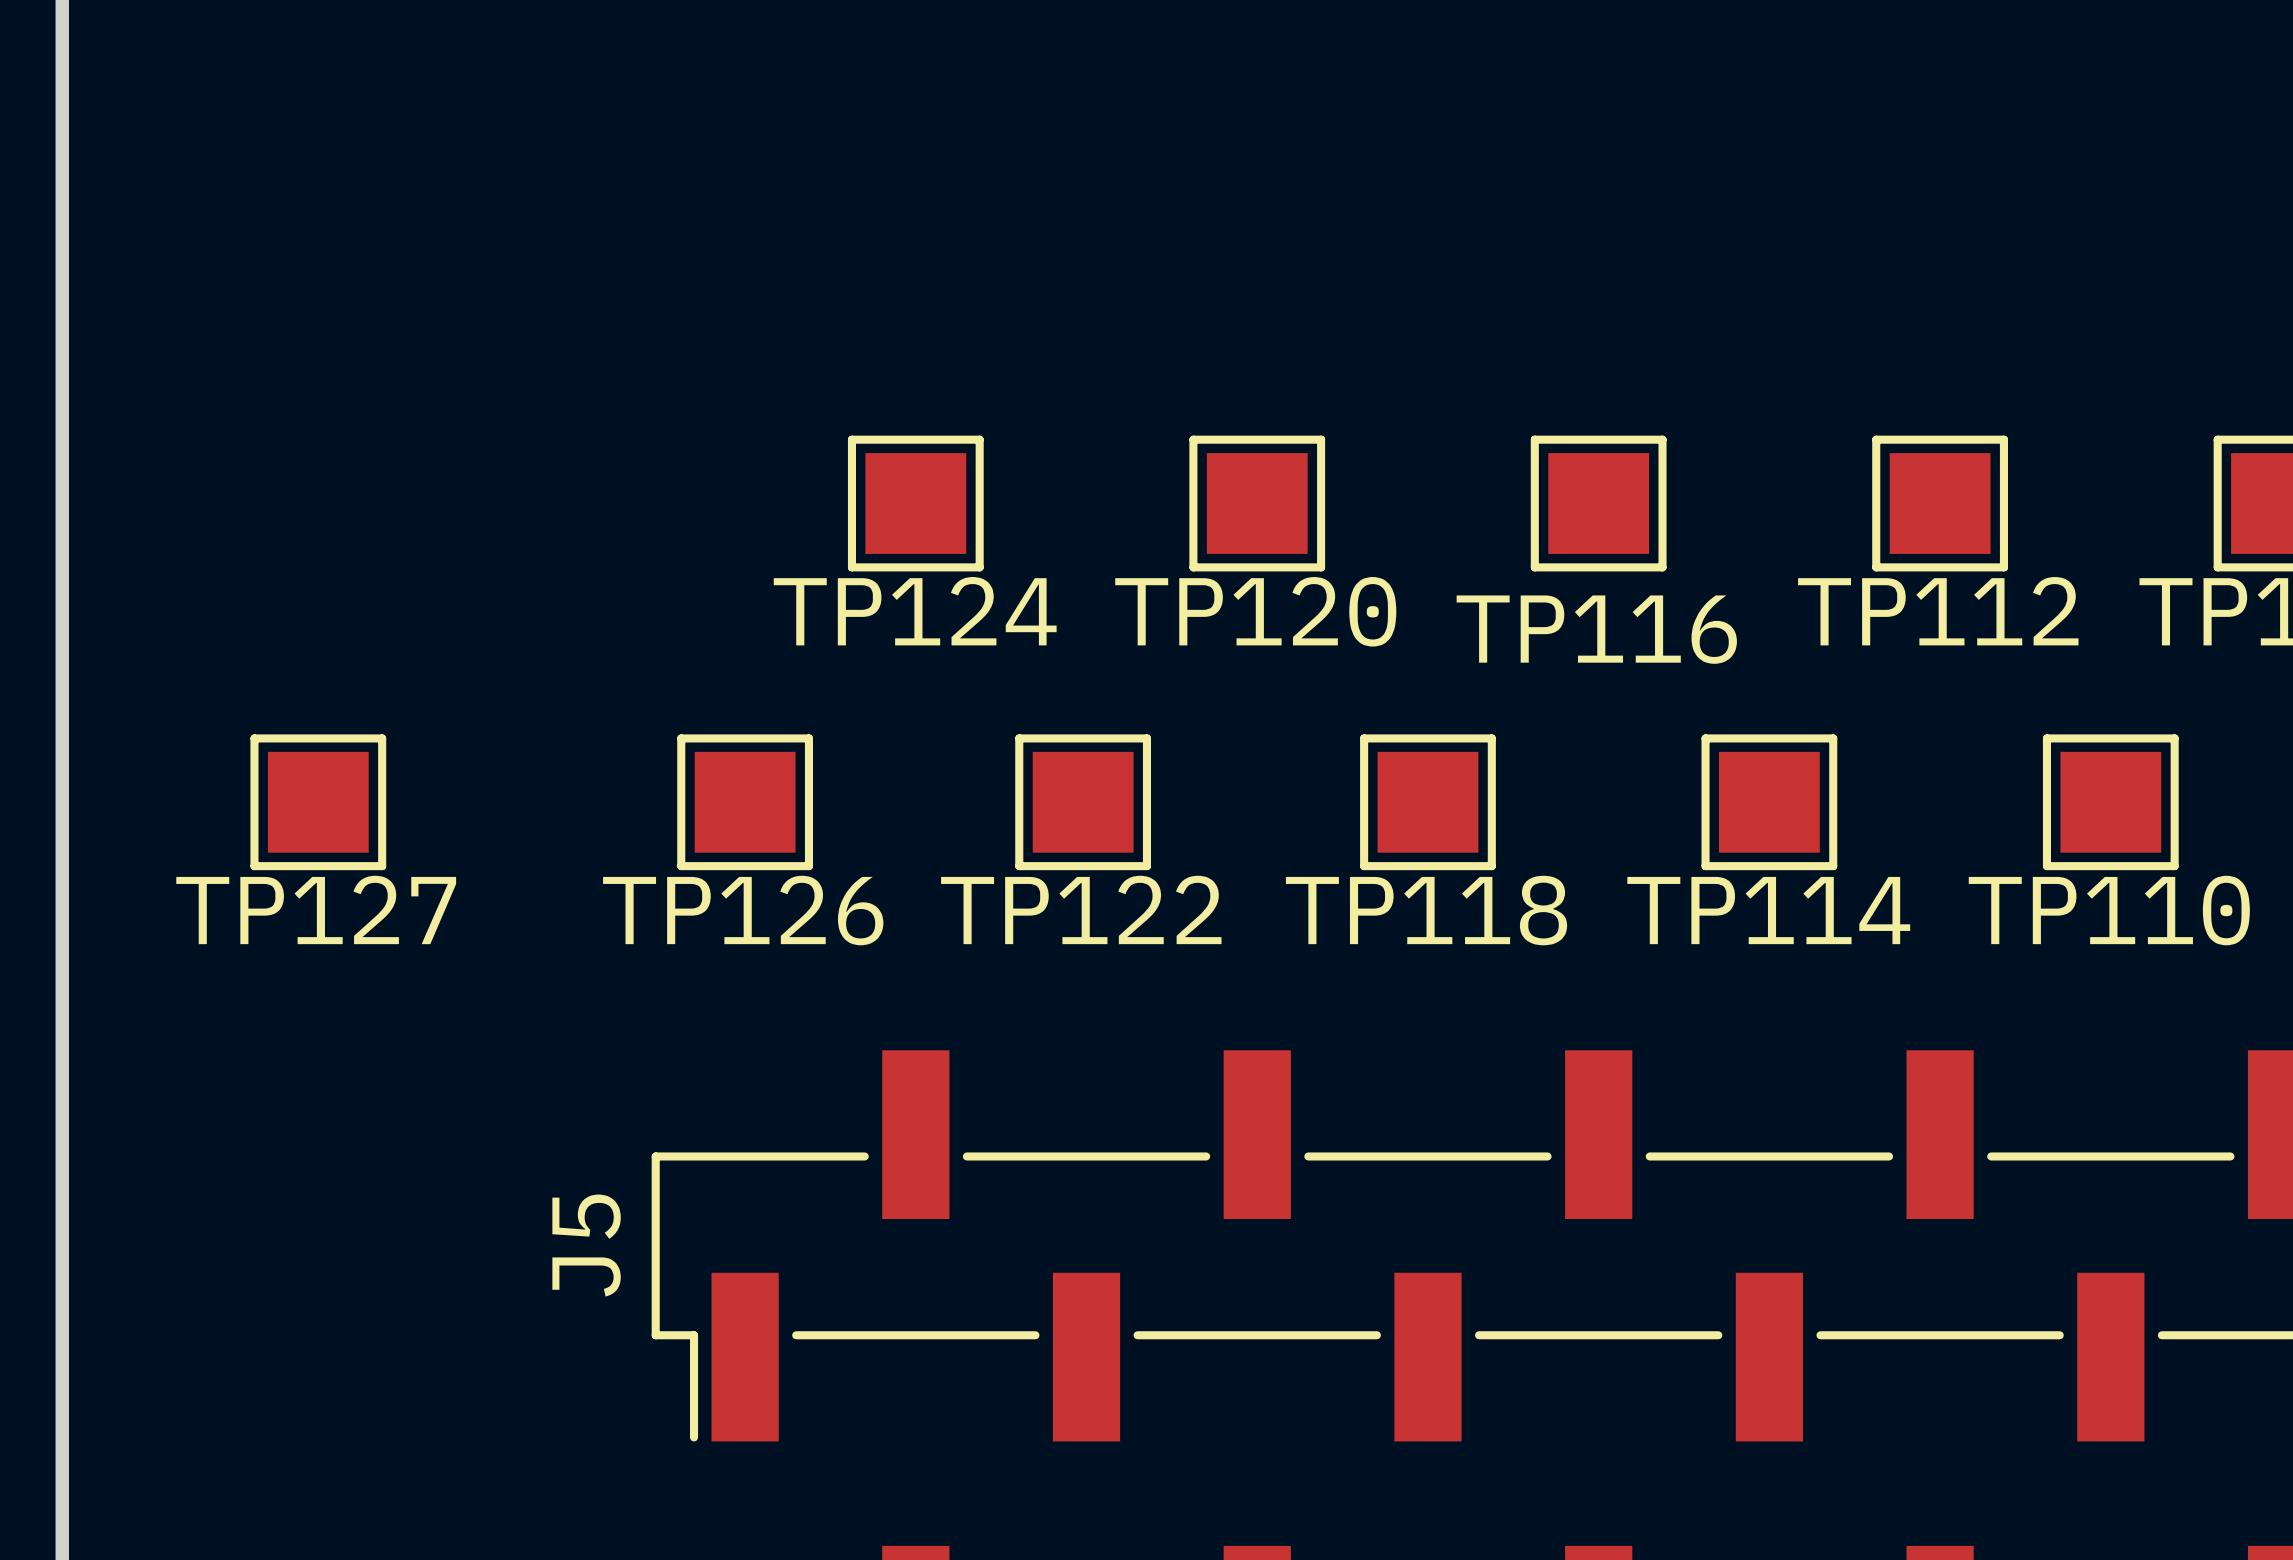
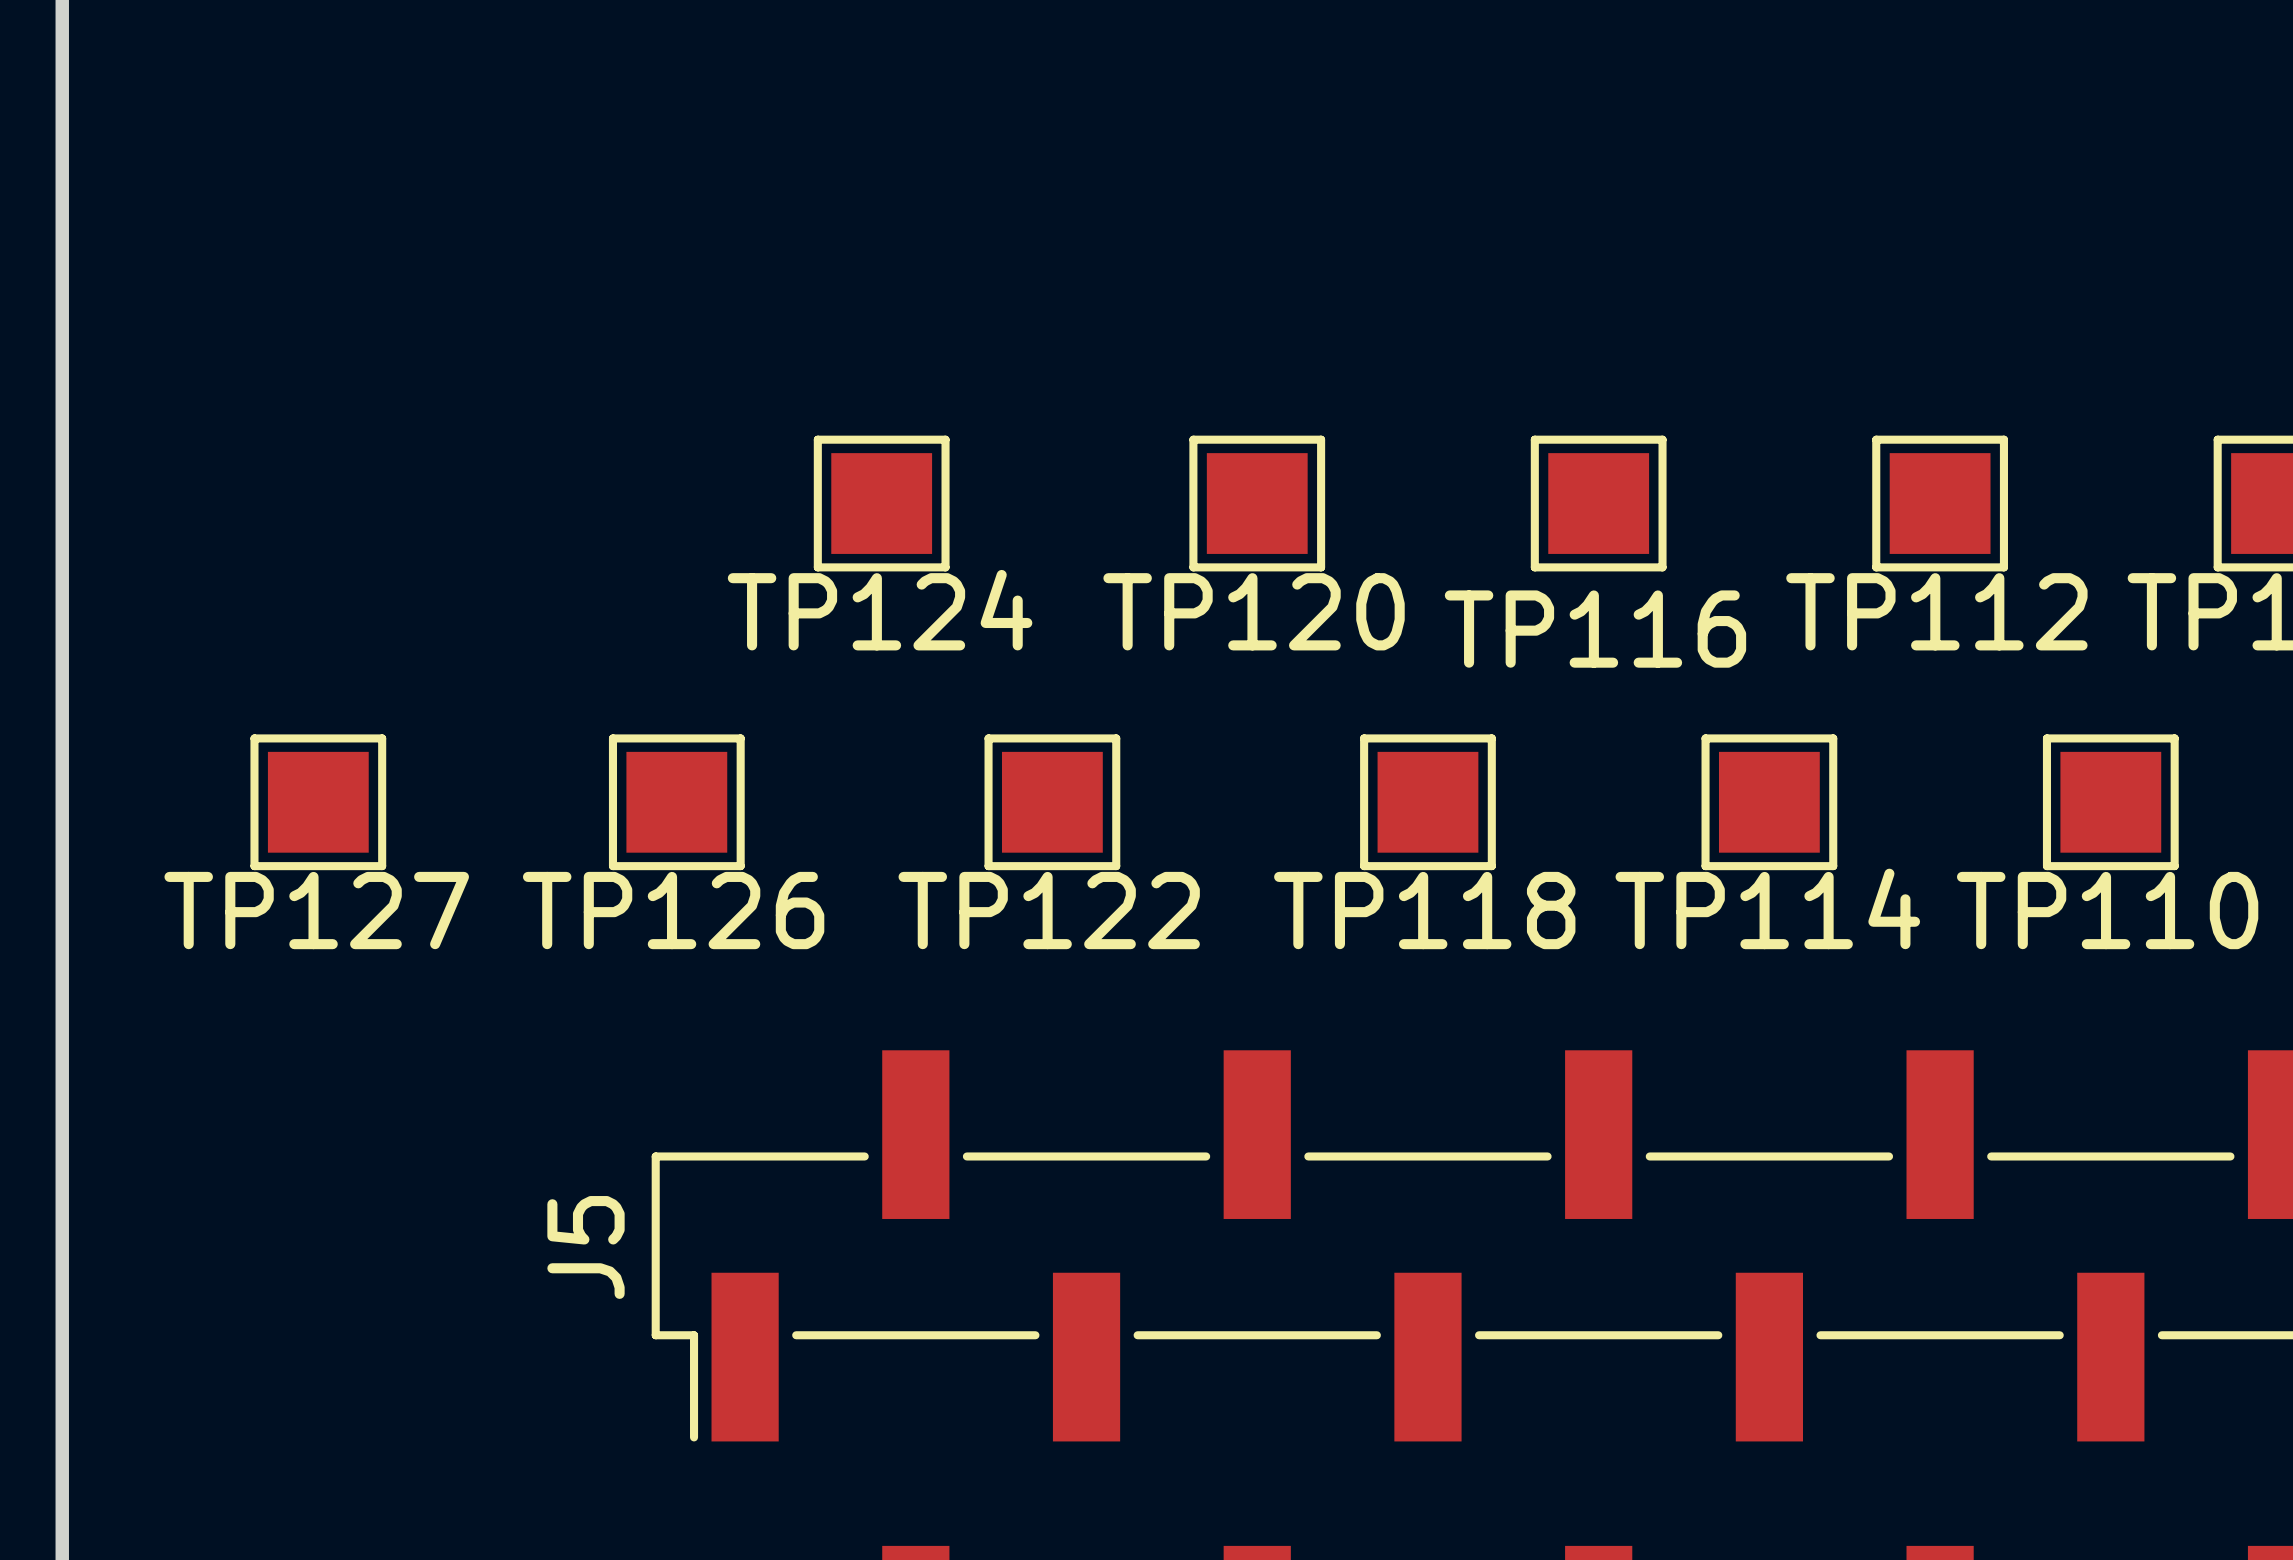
TP124 position: (915, 503) -> (881, 503)
TP126 position: (745, 802) -> (676, 802)
TP122 position: (1083, 802) -> (1052, 802)

